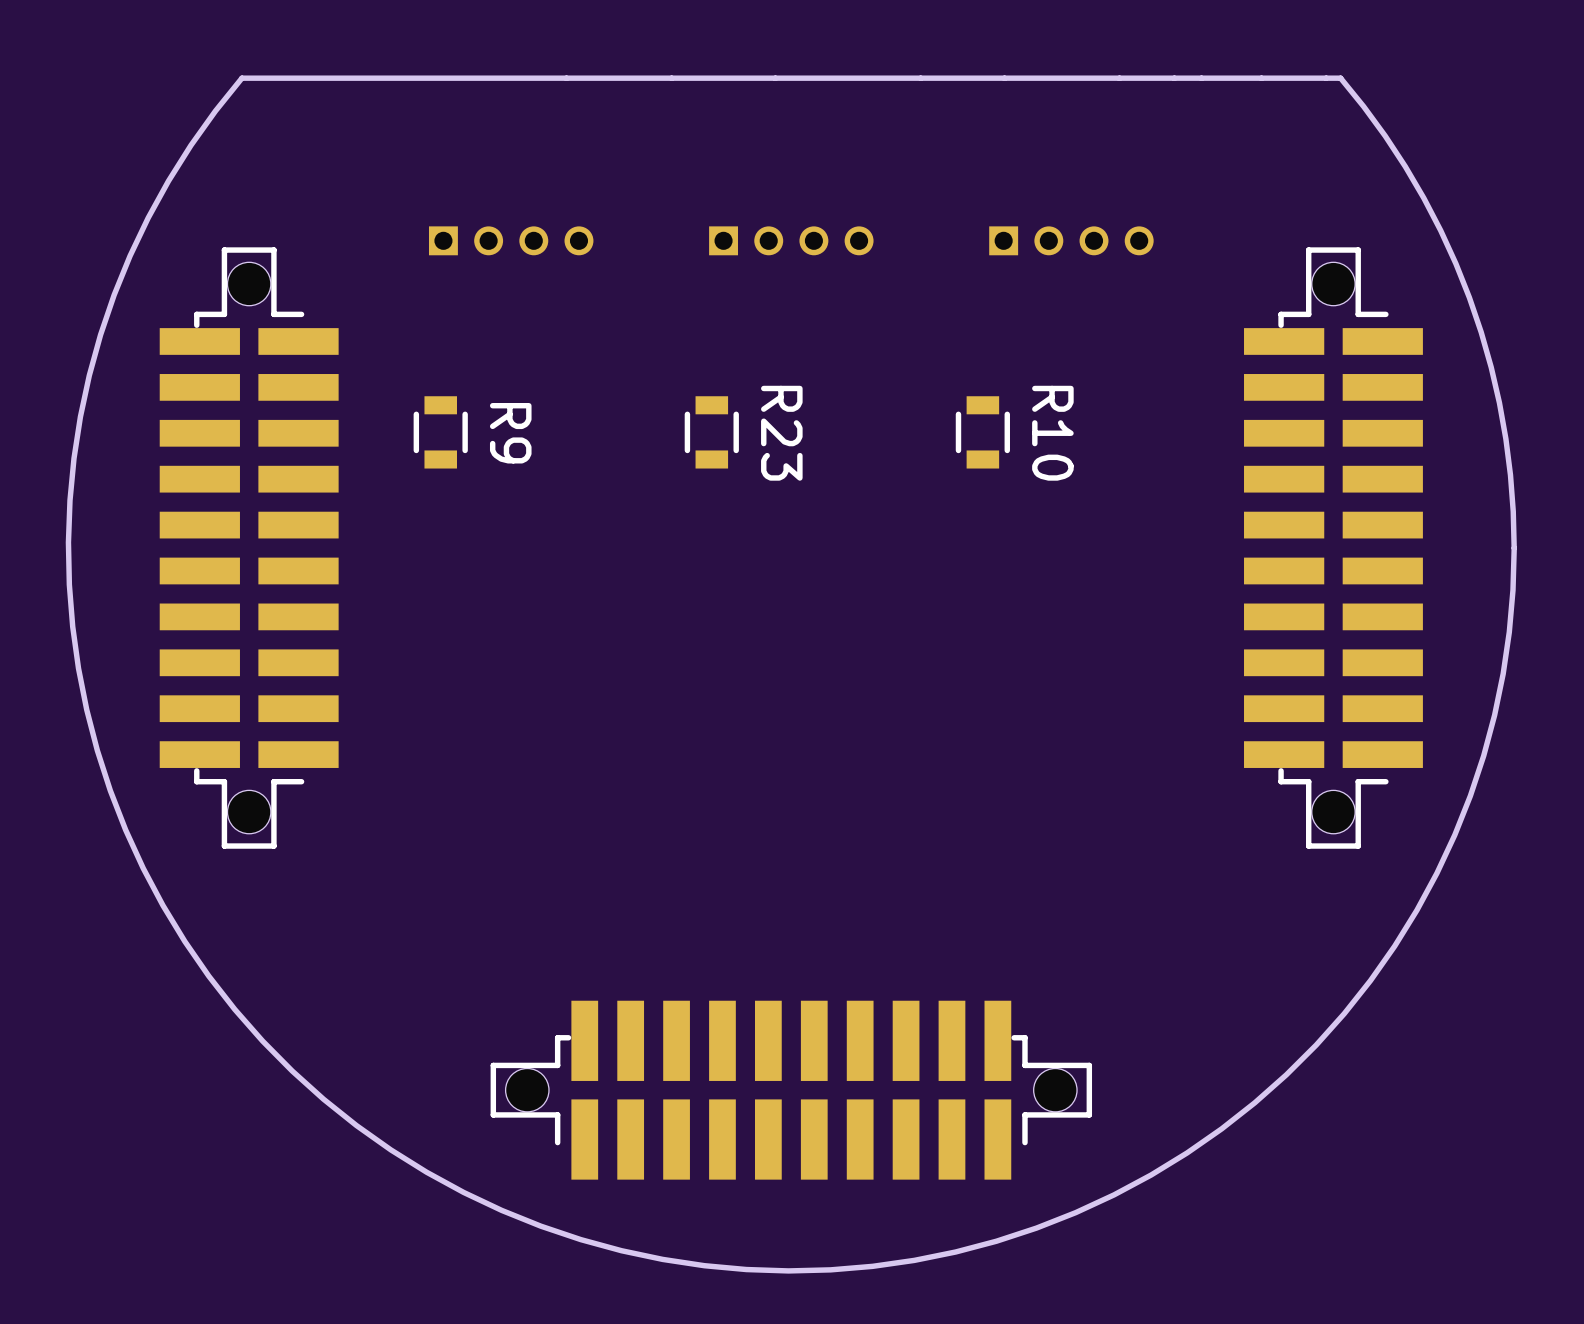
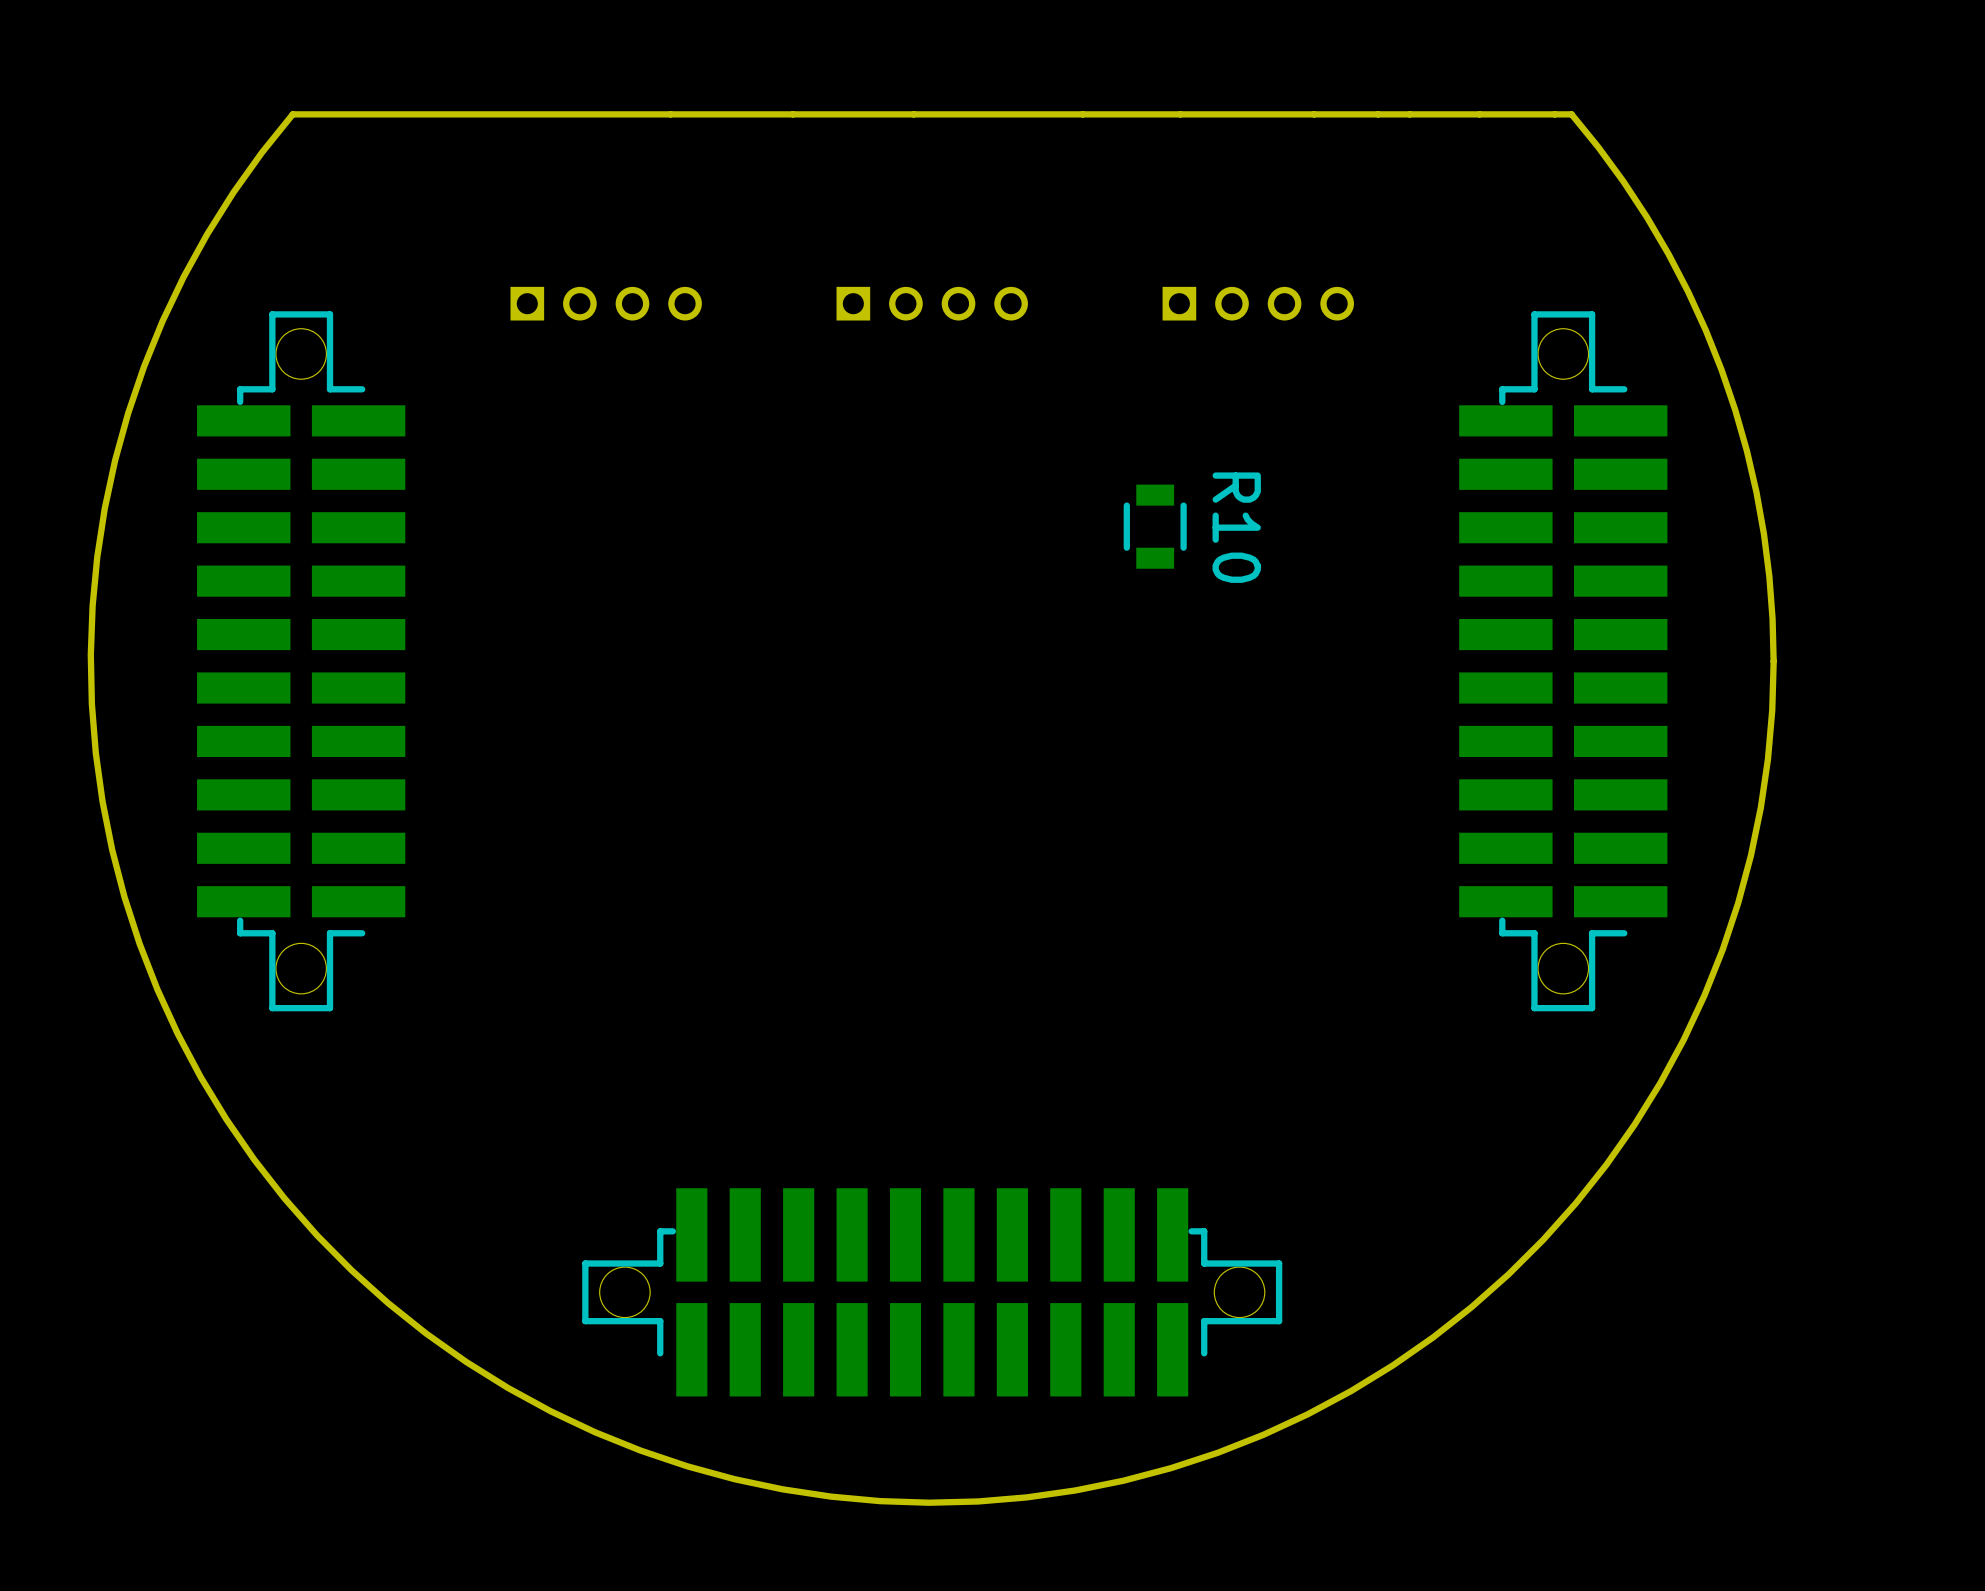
R9: (440, 432) -> none
R23: (711, 432) -> none

